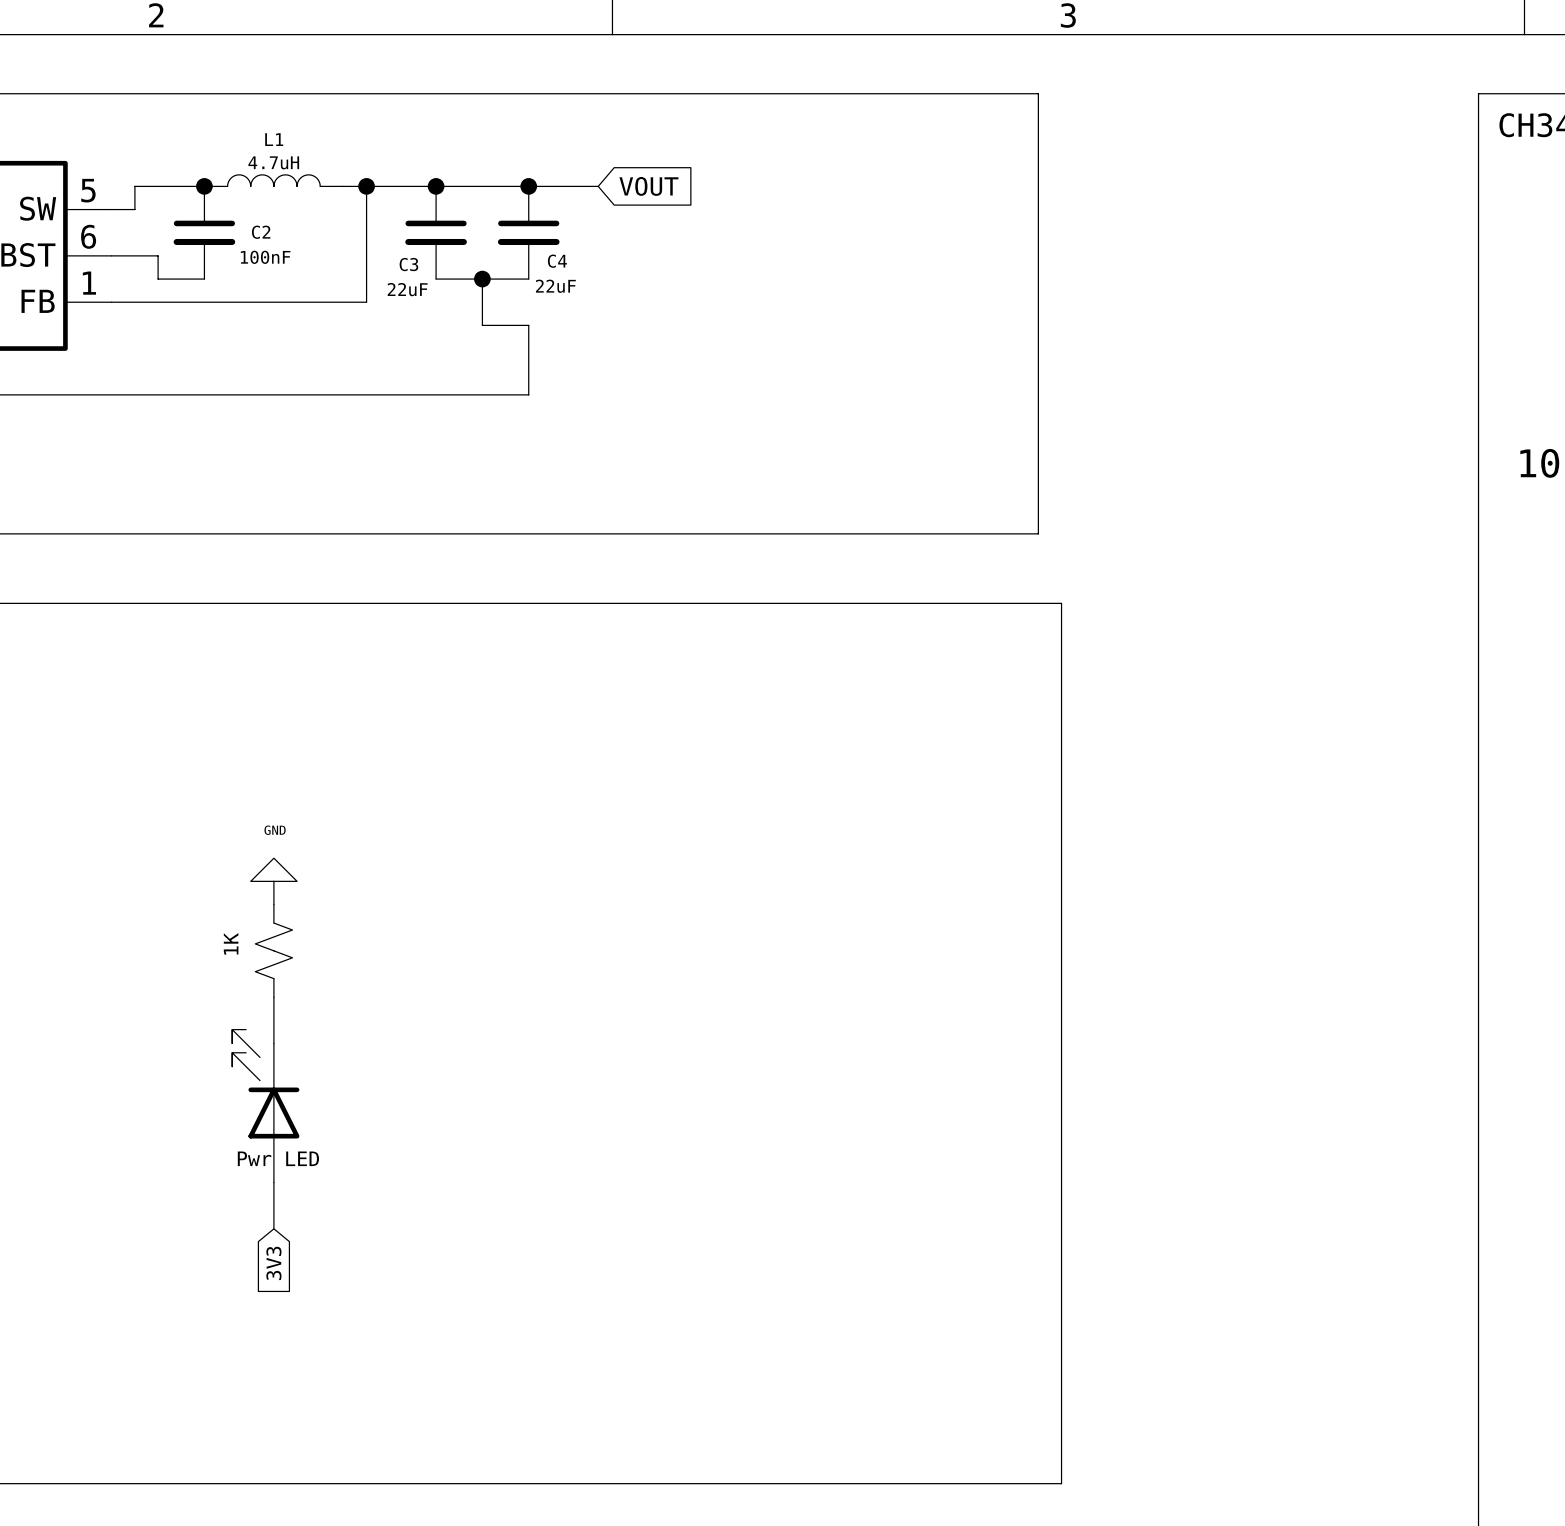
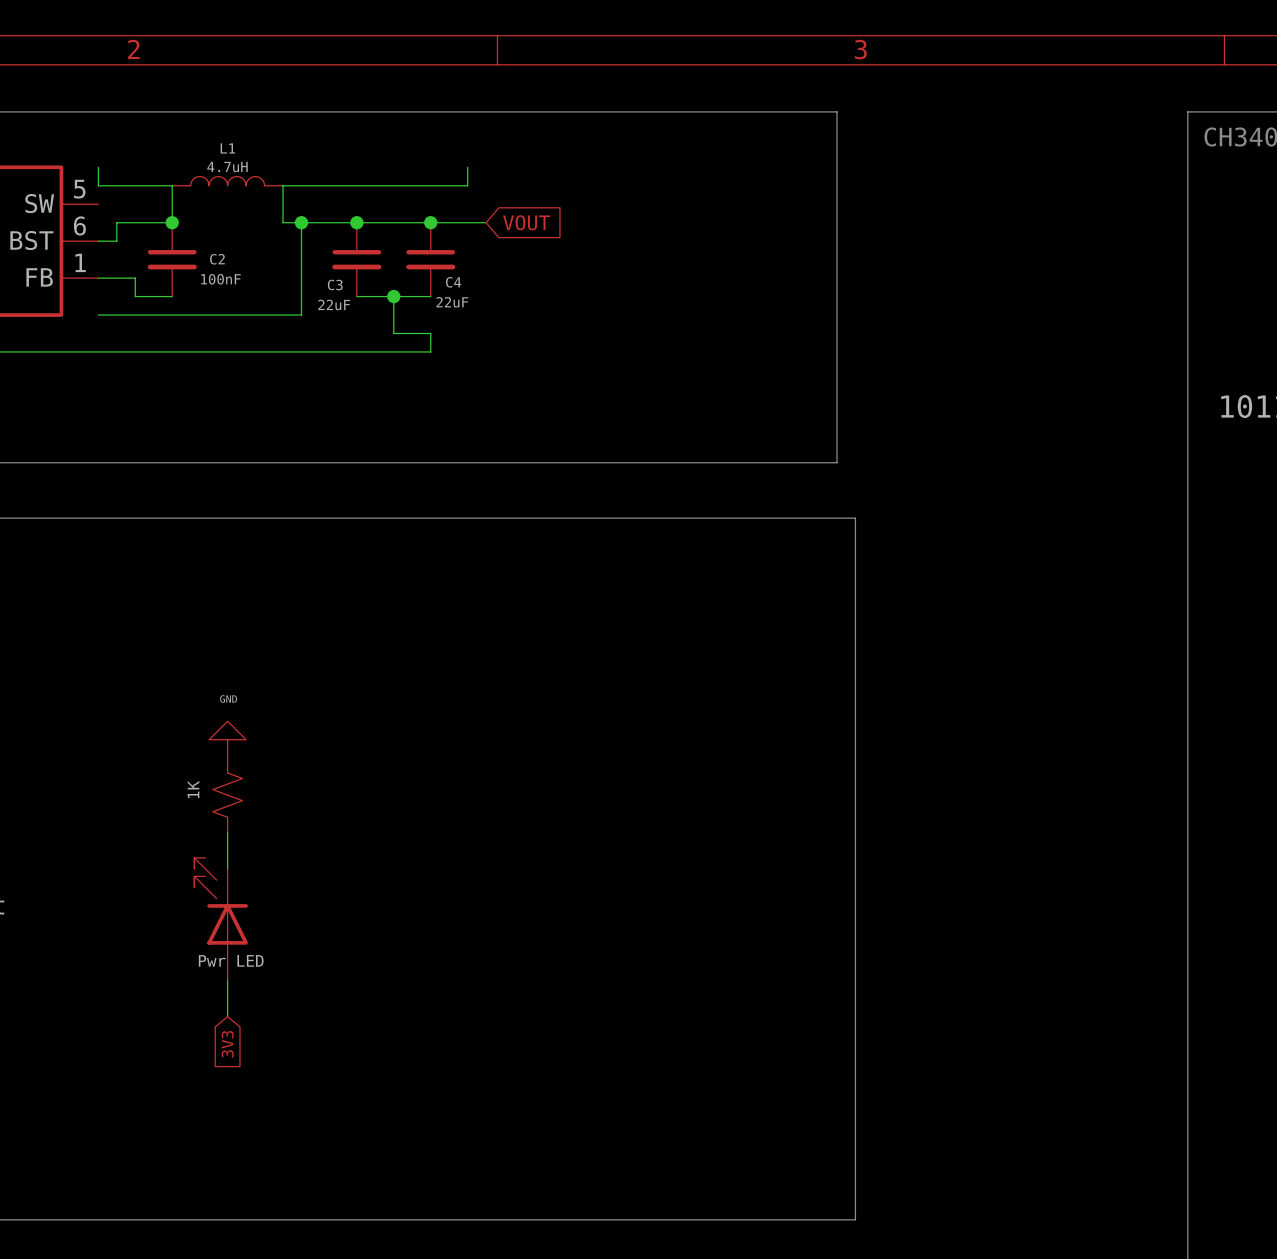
wire: (134, 186) (134, 209) (111, 209) -> (116, 185) (98, 185) (98, 167)
junction position: (204, 186) -> (172, 222)
wire: none -> (283, 185) (283, 222) (486, 222)
wire: (366, 186) (366, 232) -> none
junction: (366, 186) -> none
junction: (436, 186) -> none
junction: (528, 186) -> none
wire: (575, 186) (598, 186) -> (467, 185) (467, 167)
global label position: VOUT (648, 186) -> VOUT (526, 222)
C2 position: (204, 232) -> (172, 259)
junction: none -> (301, 222)
junction: none -> (356, 222)
C3 position: (436, 232) -> (356, 259)
junction: none -> (430, 222)
C4 position: (528, 232) -> (430, 259)
wire: (134, 255) (158, 255) (158, 279) (204, 279) -> (116, 241) (116, 222) (172, 222) (172, 185)
wire: (436, 279) (528, 279) -> none
wire: (482, 279) (482, 325) -> none
junction: (482, 279) -> none
wire: (158, 302) (366, 302) -> (98, 315) (301, 315) (301, 278)
wire: none -> (135, 278) (135, 296) (172, 296)
junction: none -> (393, 296)
wire: (528, 325) (528, 371) -> (356, 296) (393, 296) (393, 333) (430, 333)

